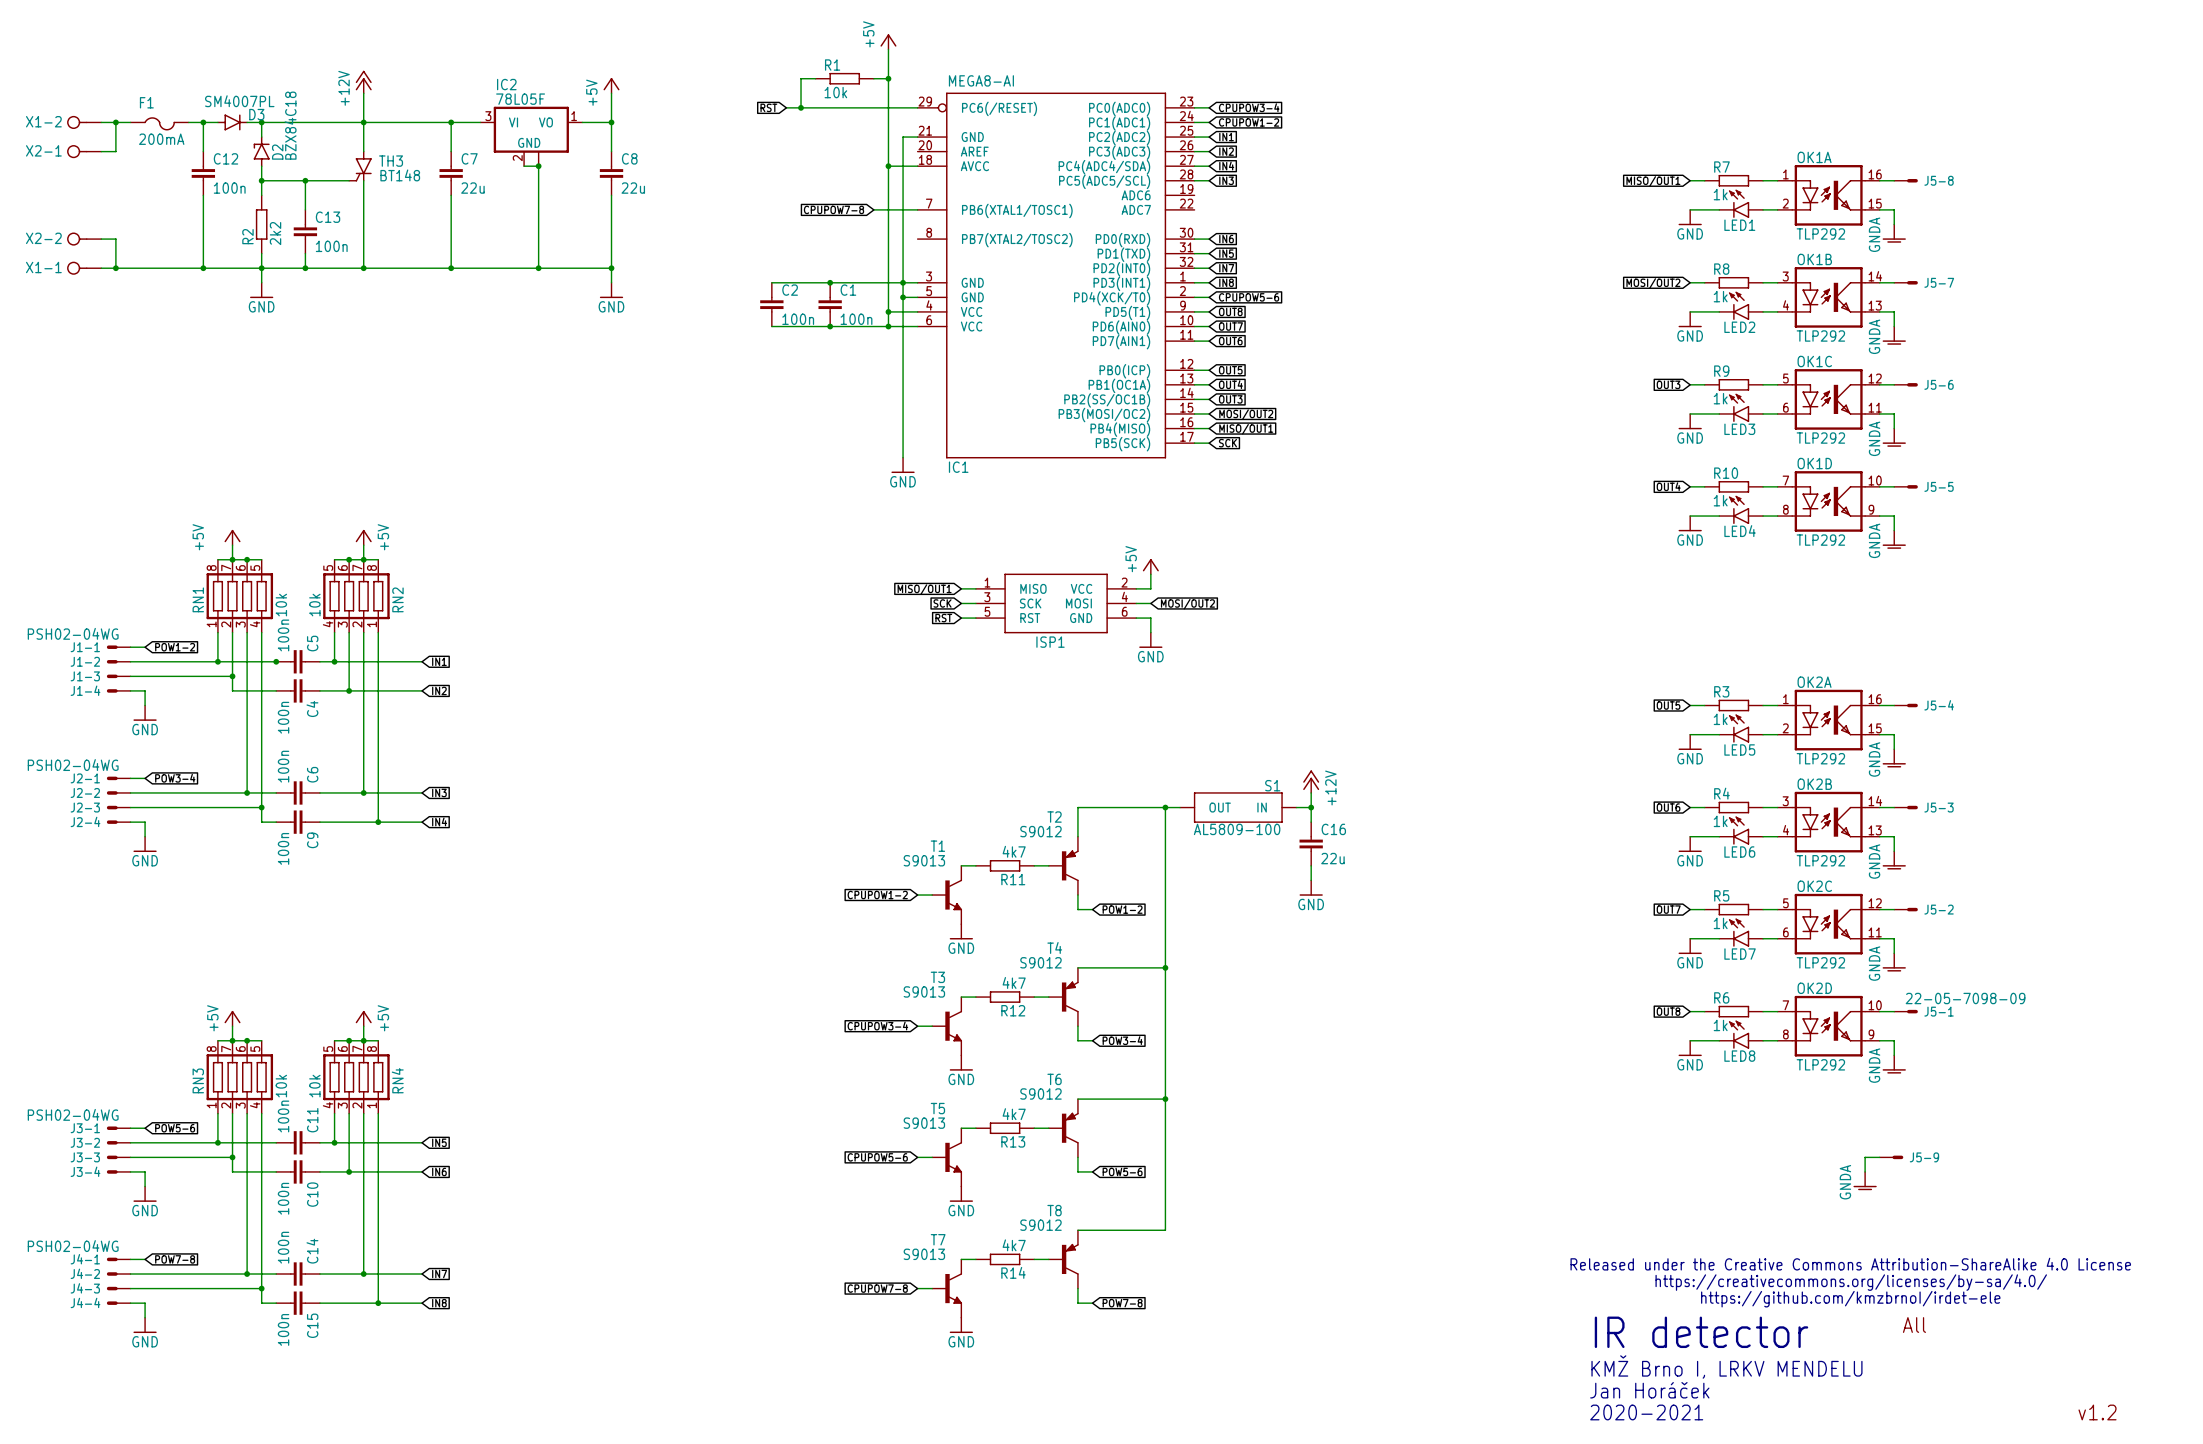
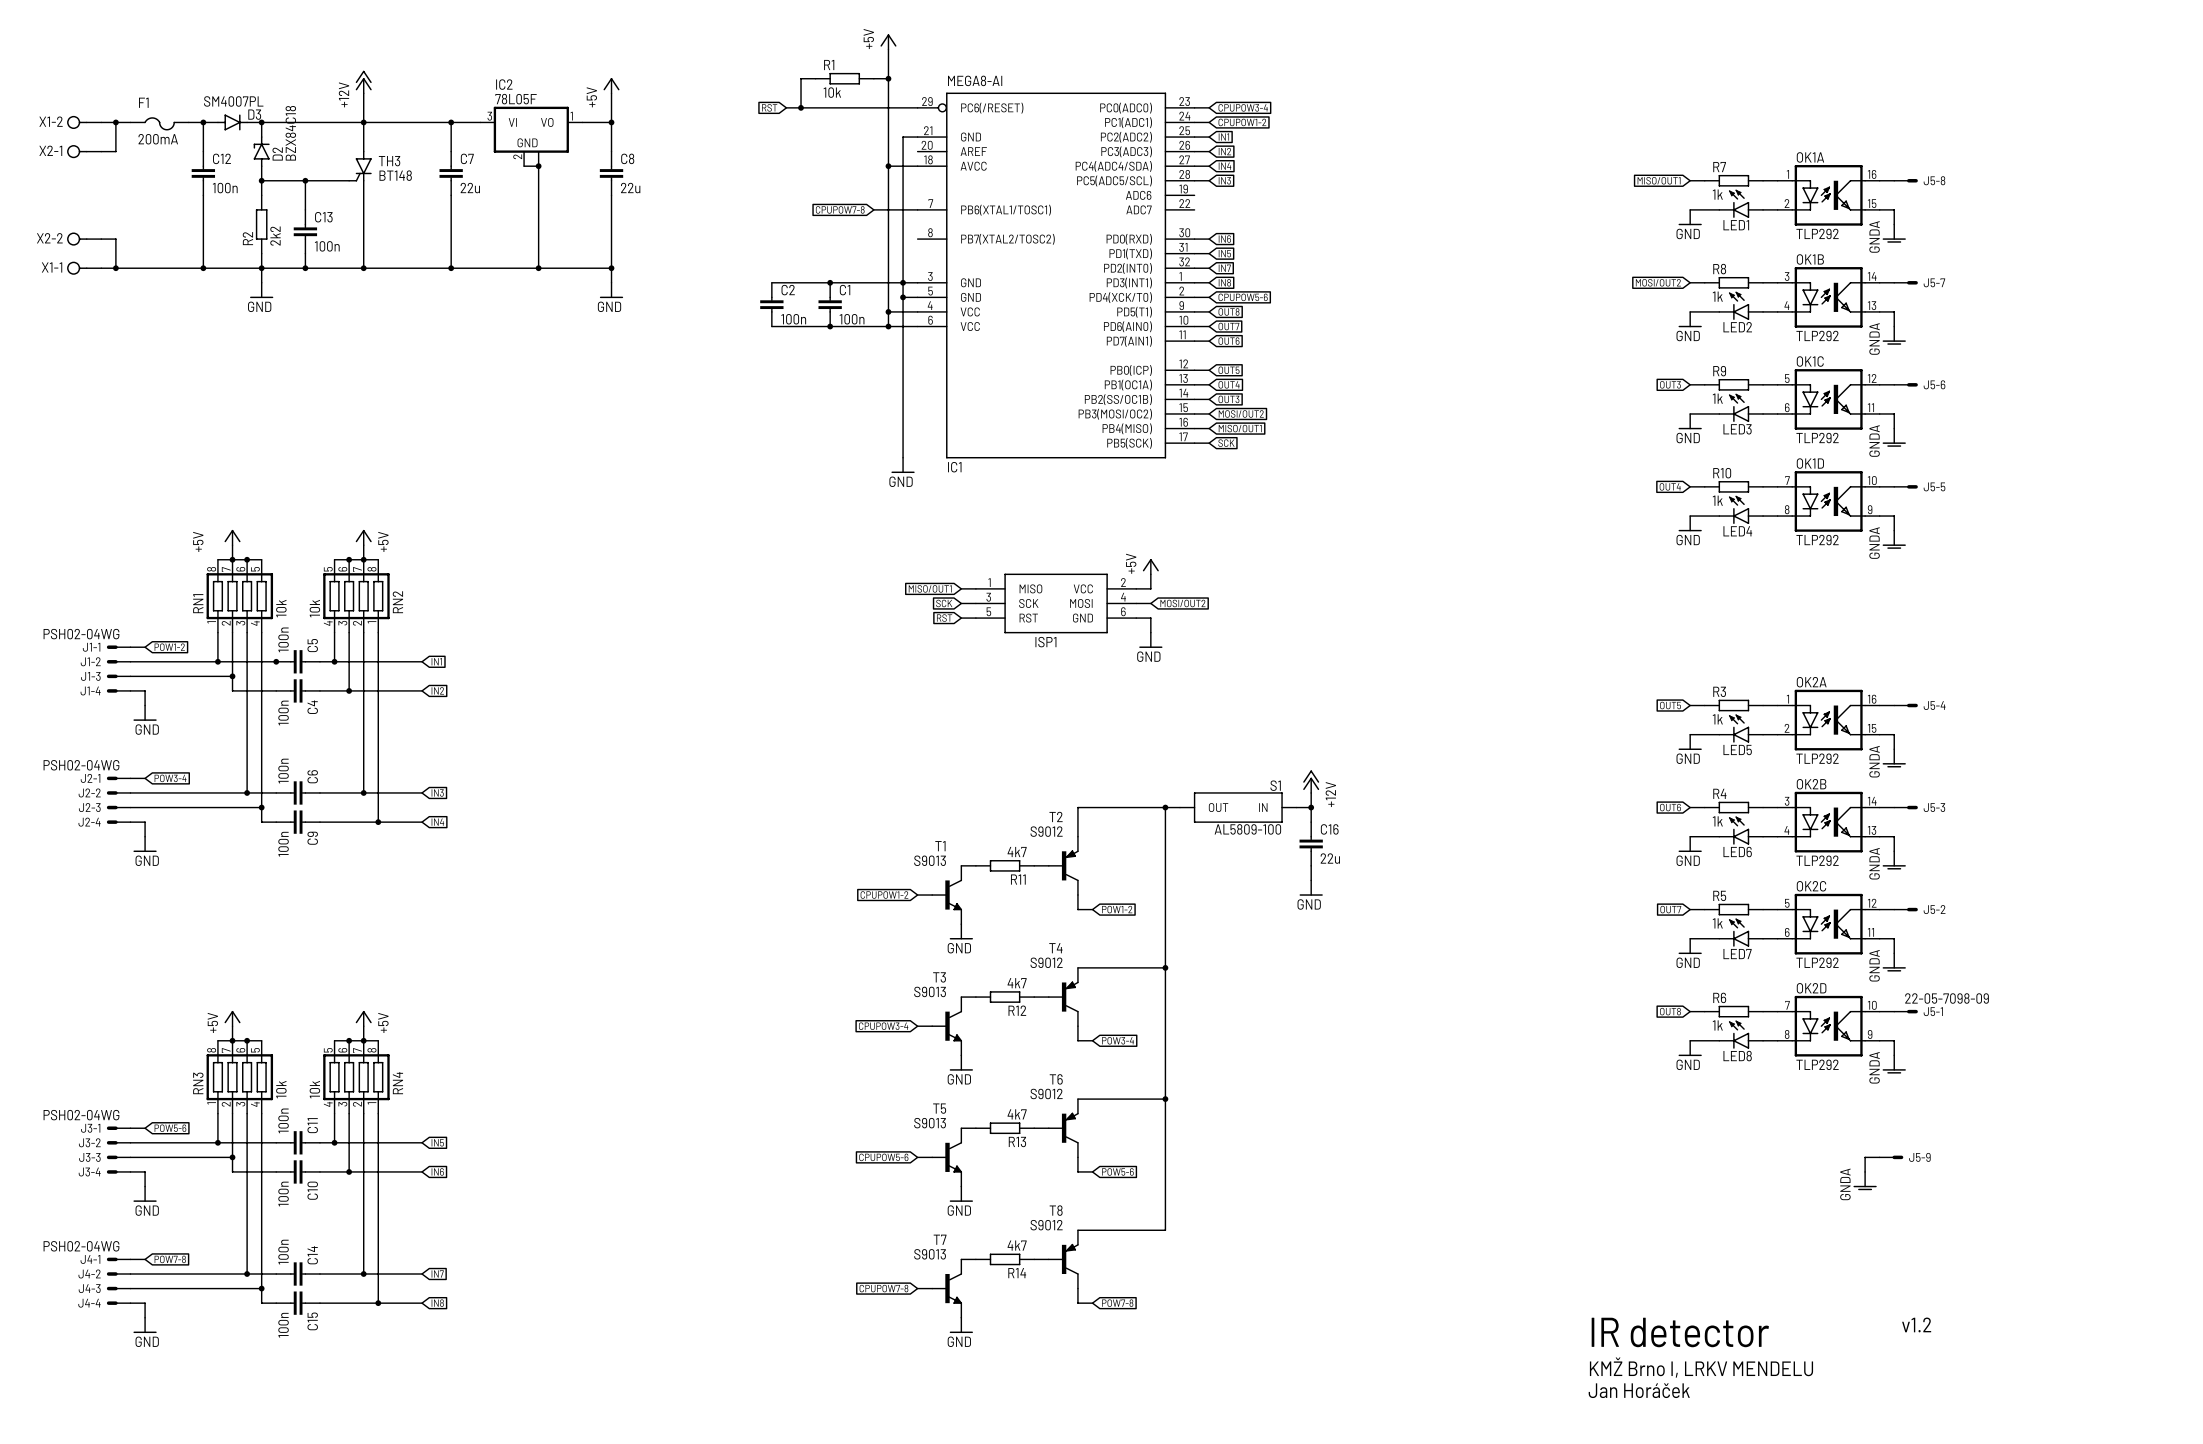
text: Released under the Creative Commons Attribution-ShareAlike 4.0 License (1850, 1264) -> none
text: https://creativecommons.org/licenses/by-sa/4.0/ (1851, 1282) -> none
text: https://github.com/kmzbrnoI/irdet-ele (1850, 1299) -> none
text: All (1914, 1325) -> v1.2 (1916, 1324)
text: 2020-2021 (1646, 1412) -> none
text: v1.2 (2097, 1412) -> none

